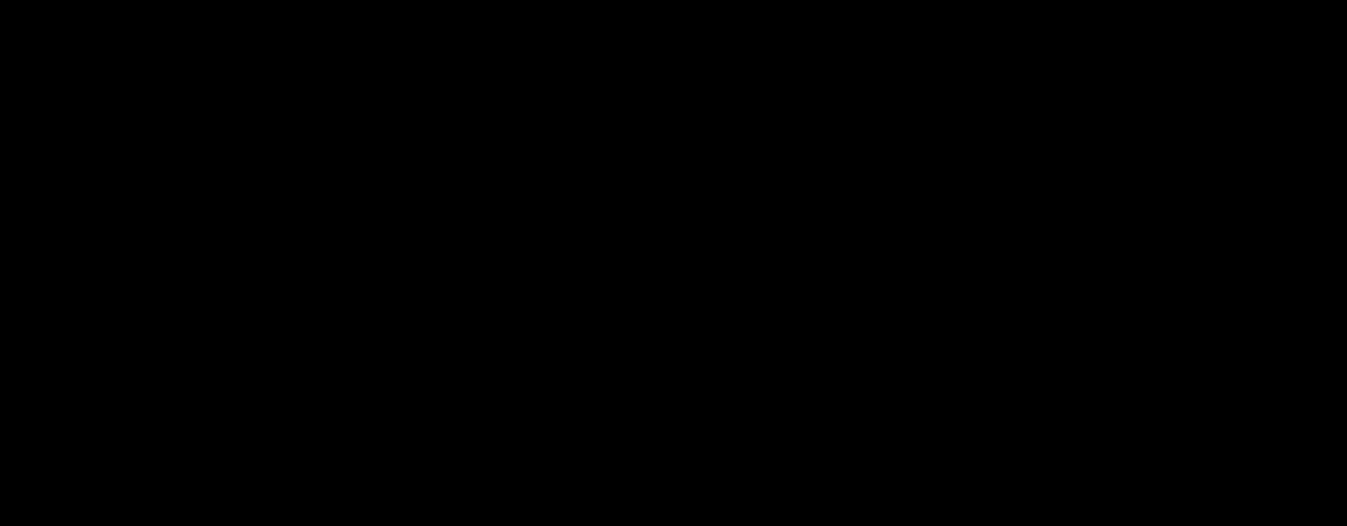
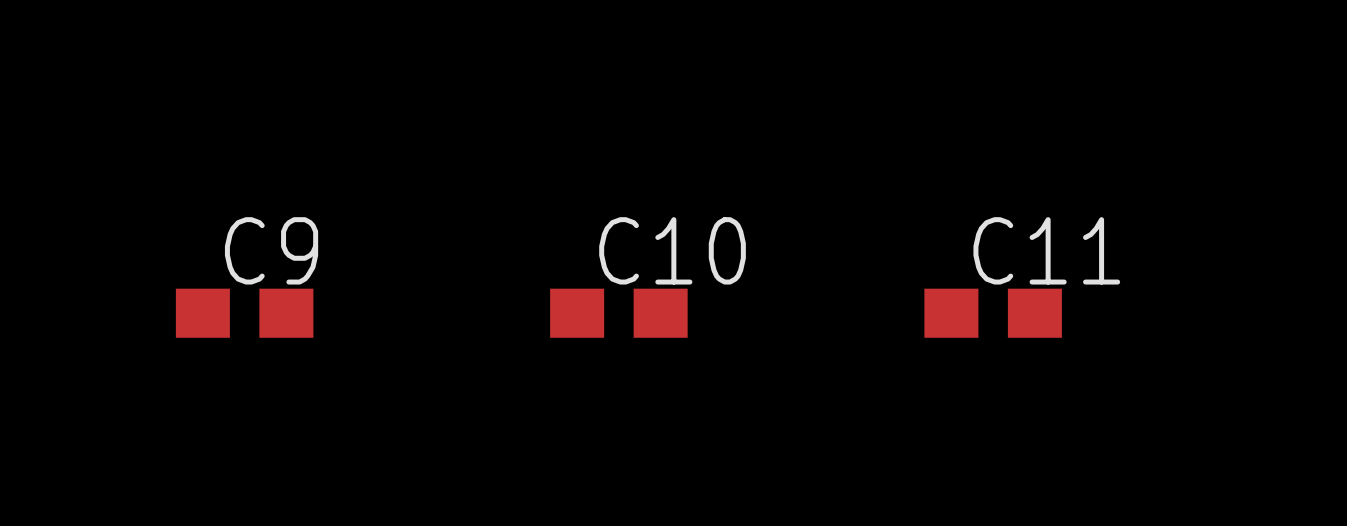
C9: none -> (244, 313)
C10: none -> (618, 313)
C11: none -> (993, 313)

